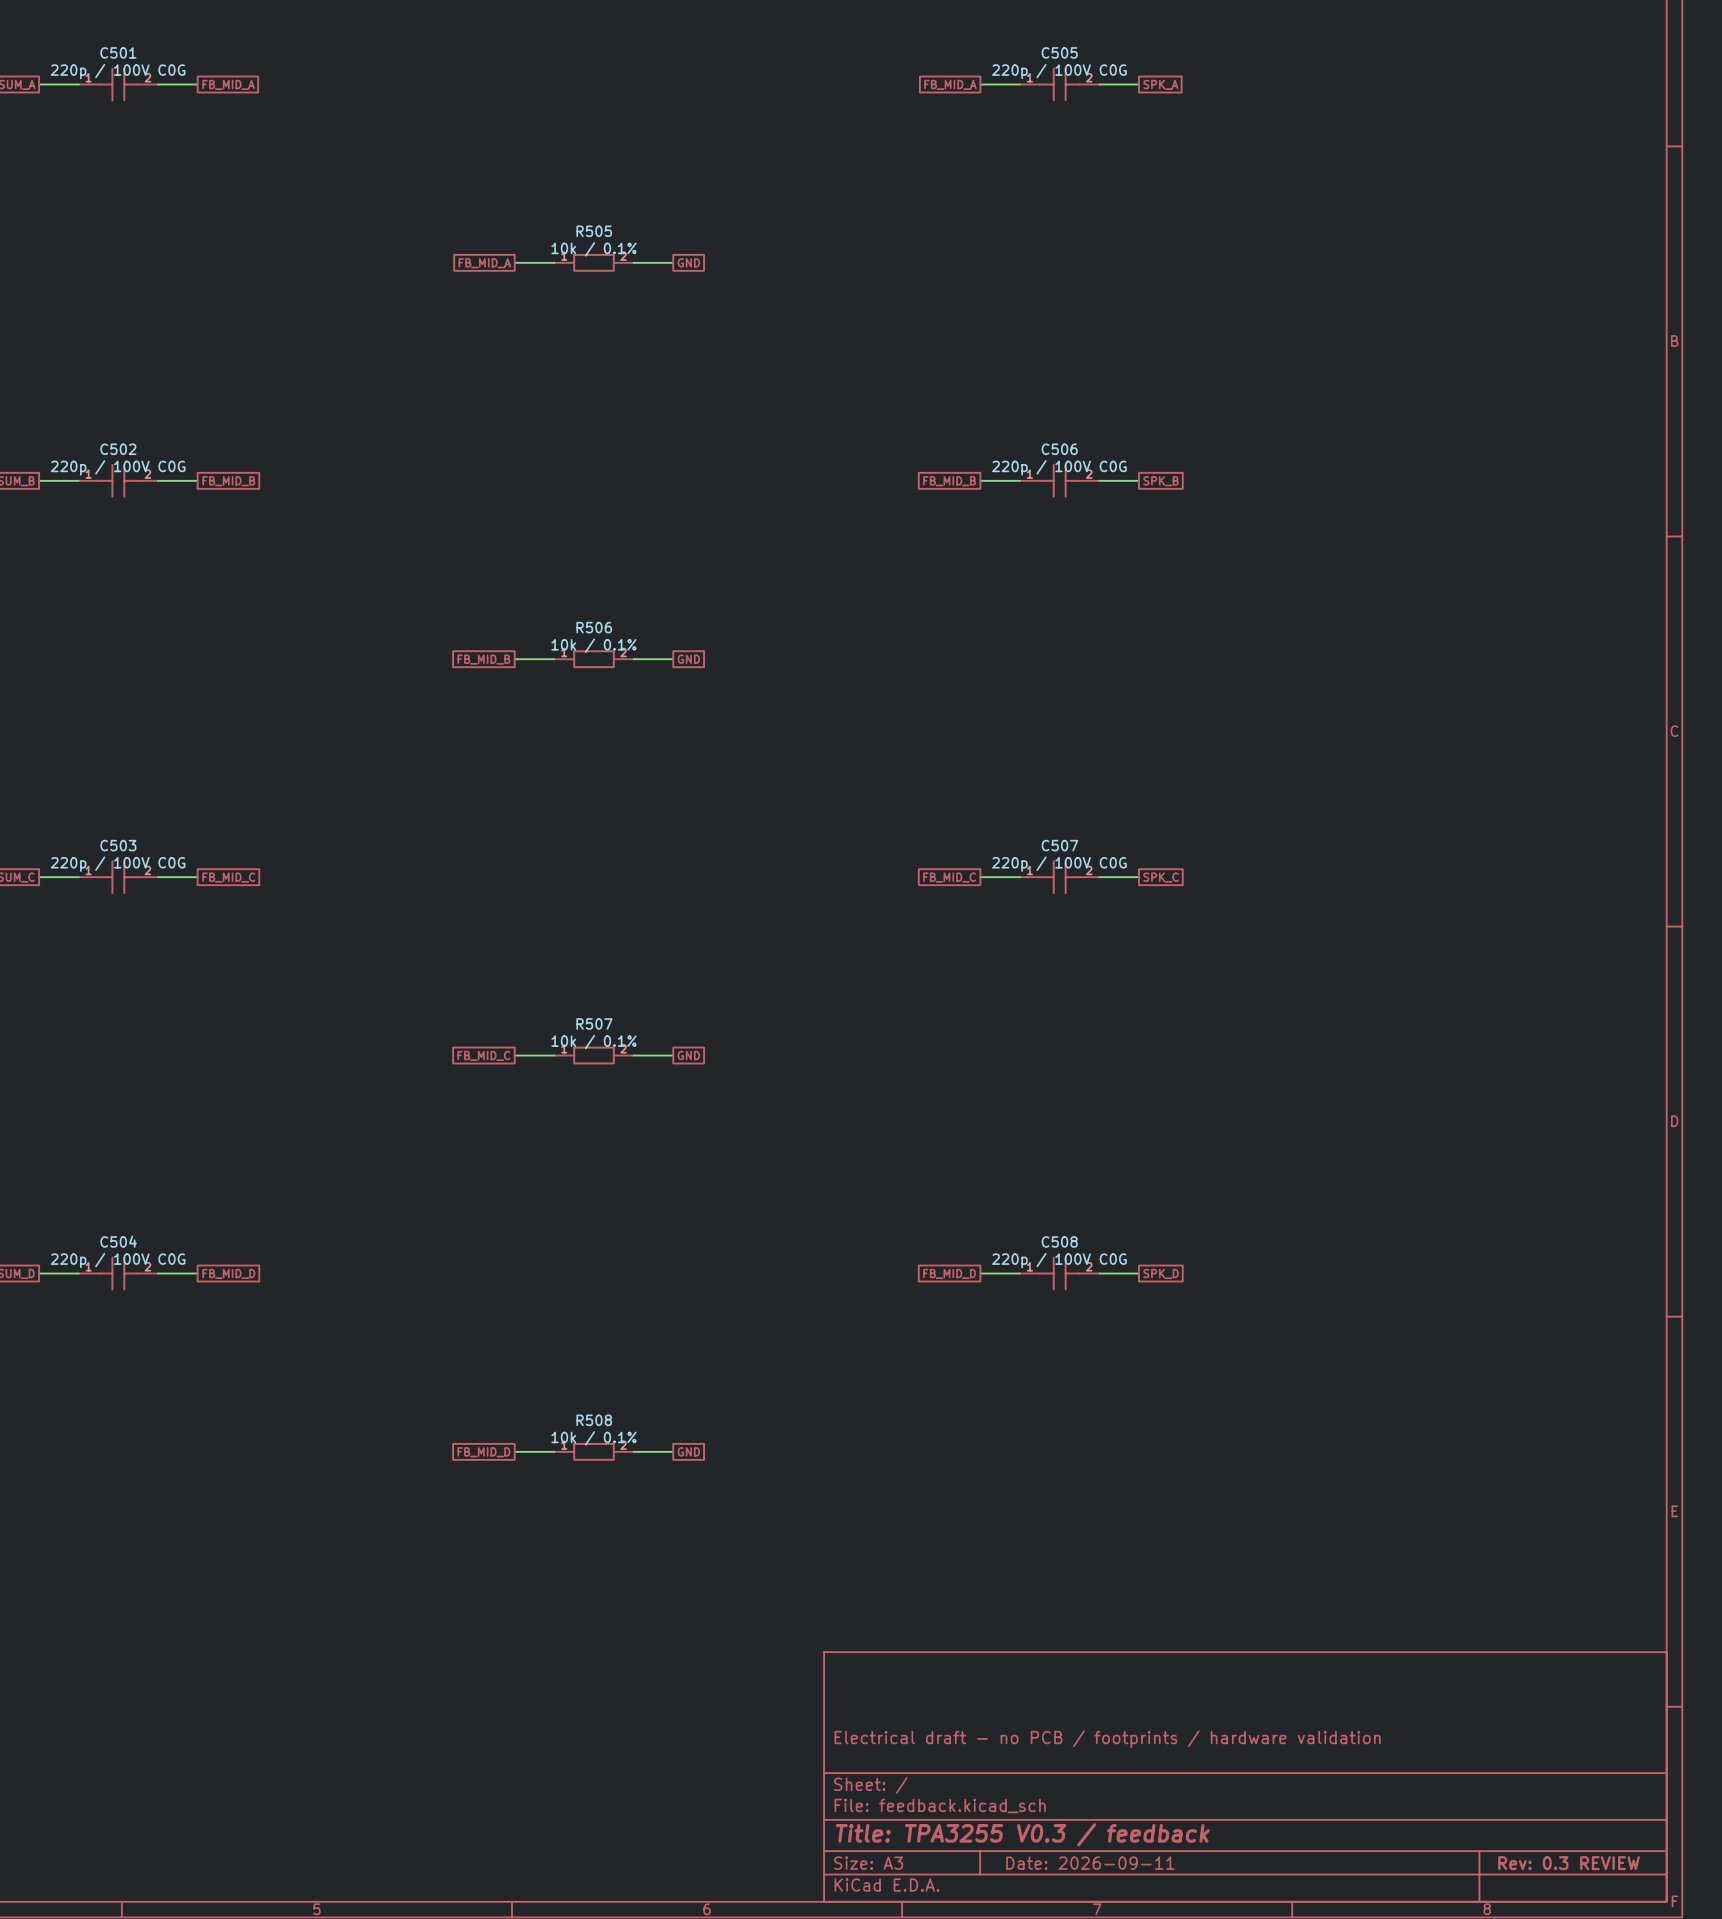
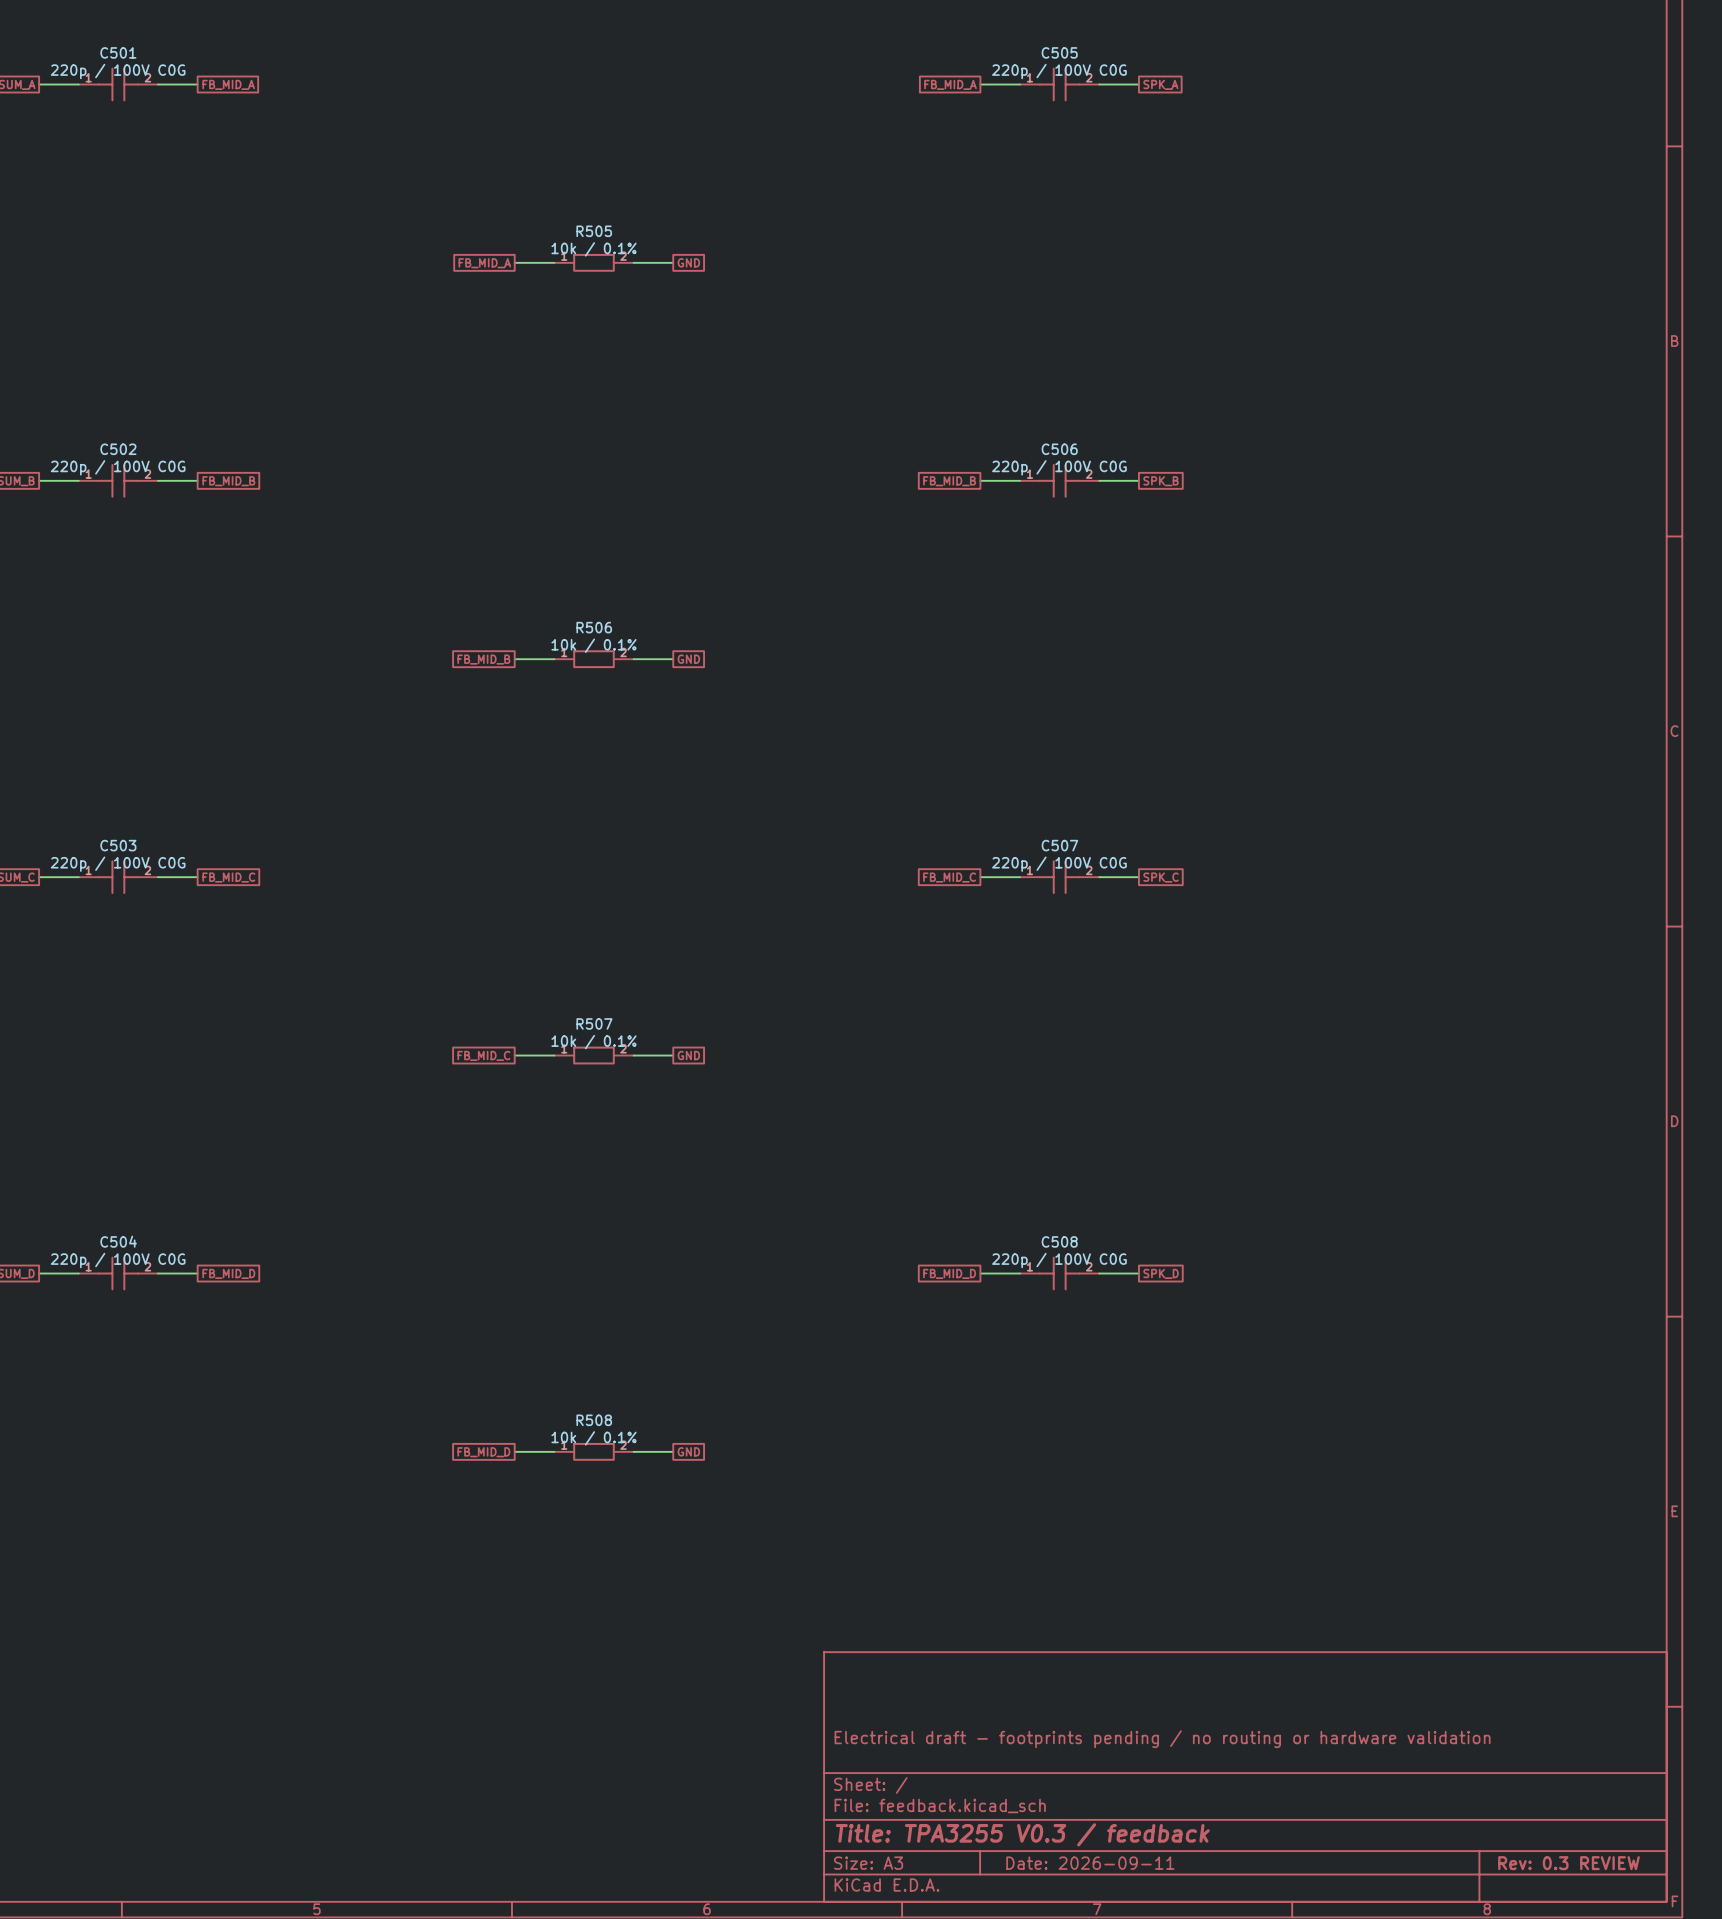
title block: Electrical draft - no PCB / footprints / hardware validation (1107, 1739) -> Electrical draft - footprints pending / no routing or hardware validation (1162, 1739)

